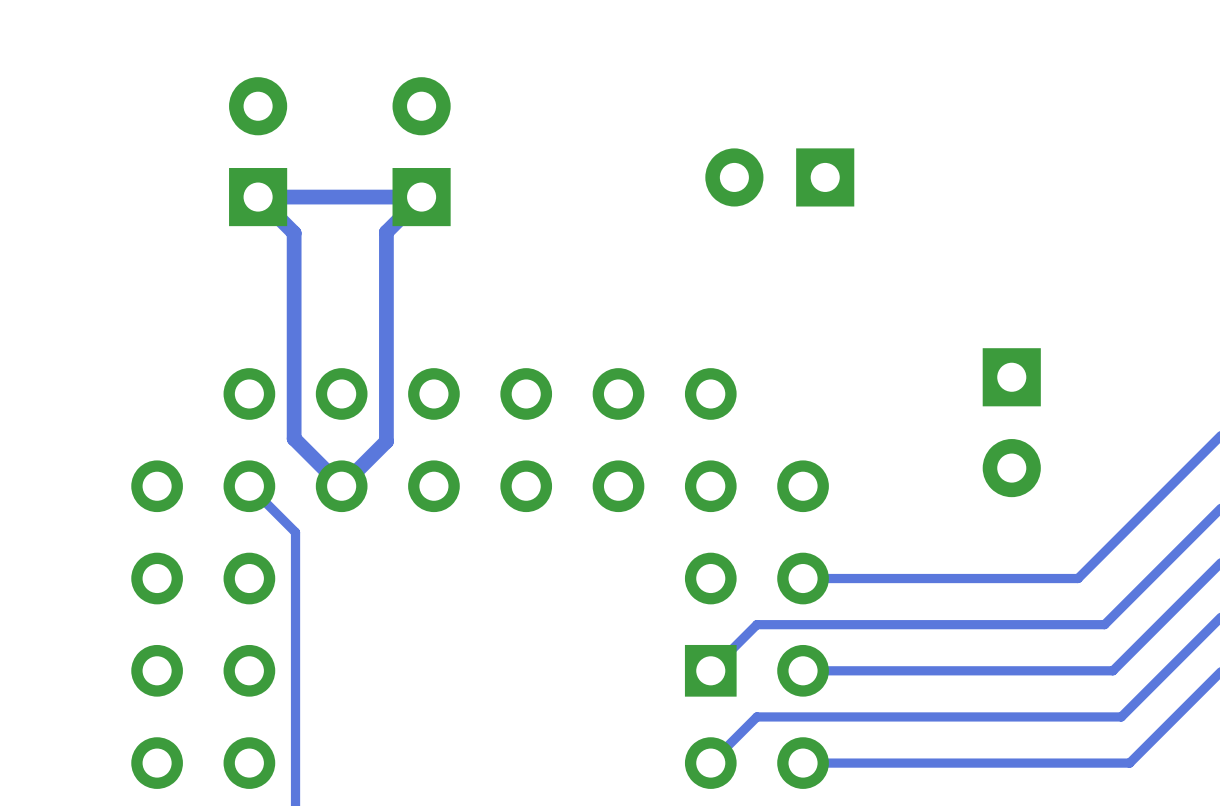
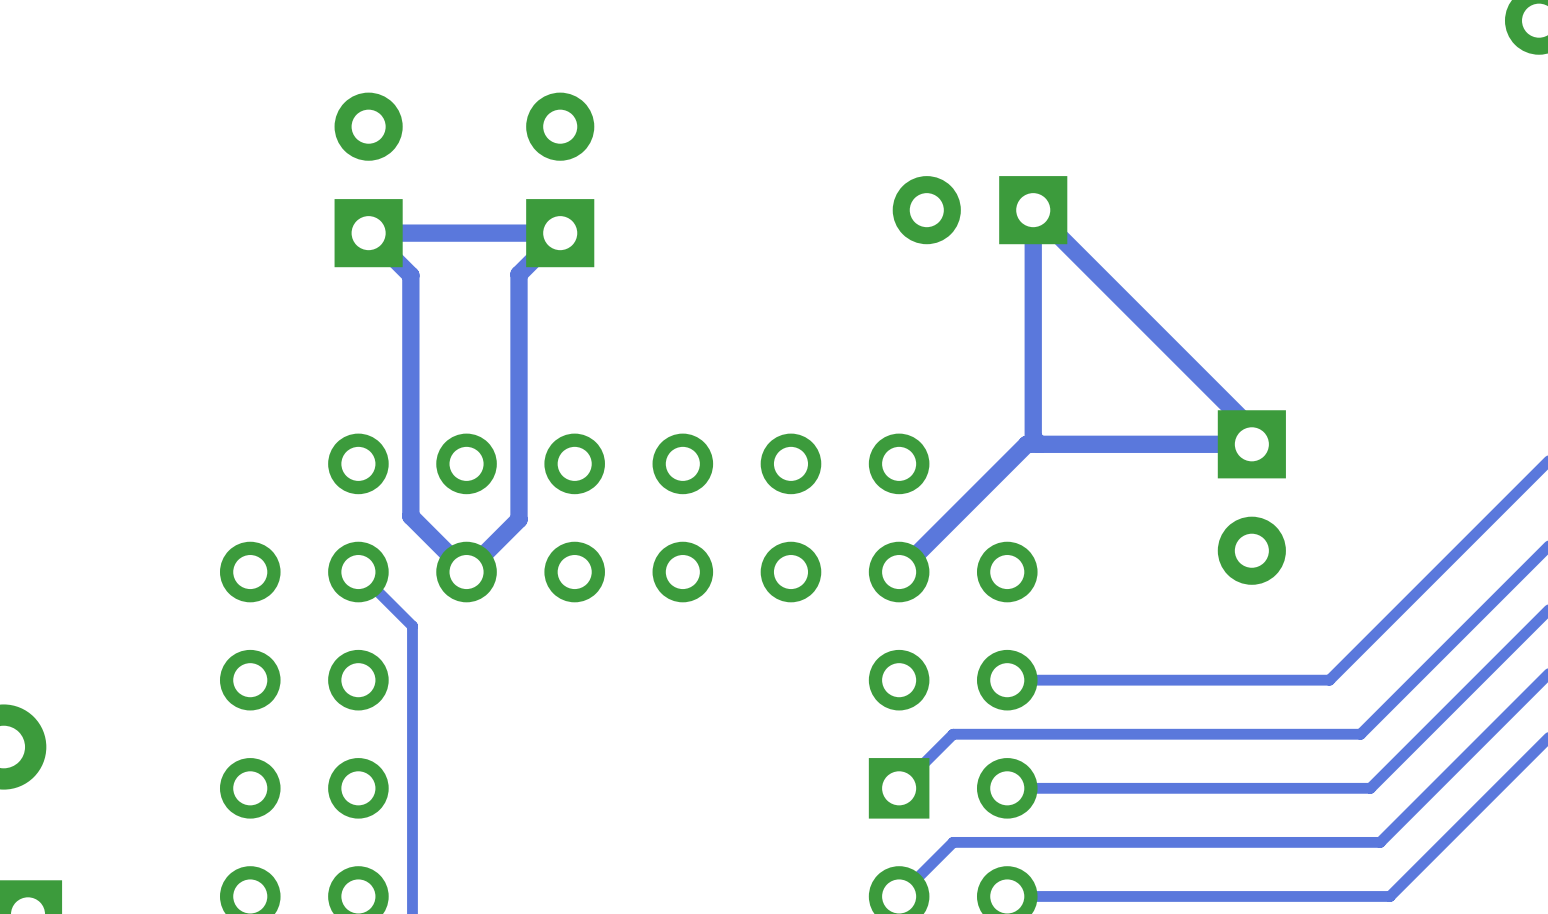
track: none -> (1251, 428) (1033, 210) (1033, 437) (1039, 444)
track: none -> (1251, 444) (1026, 444) (899, 572)

